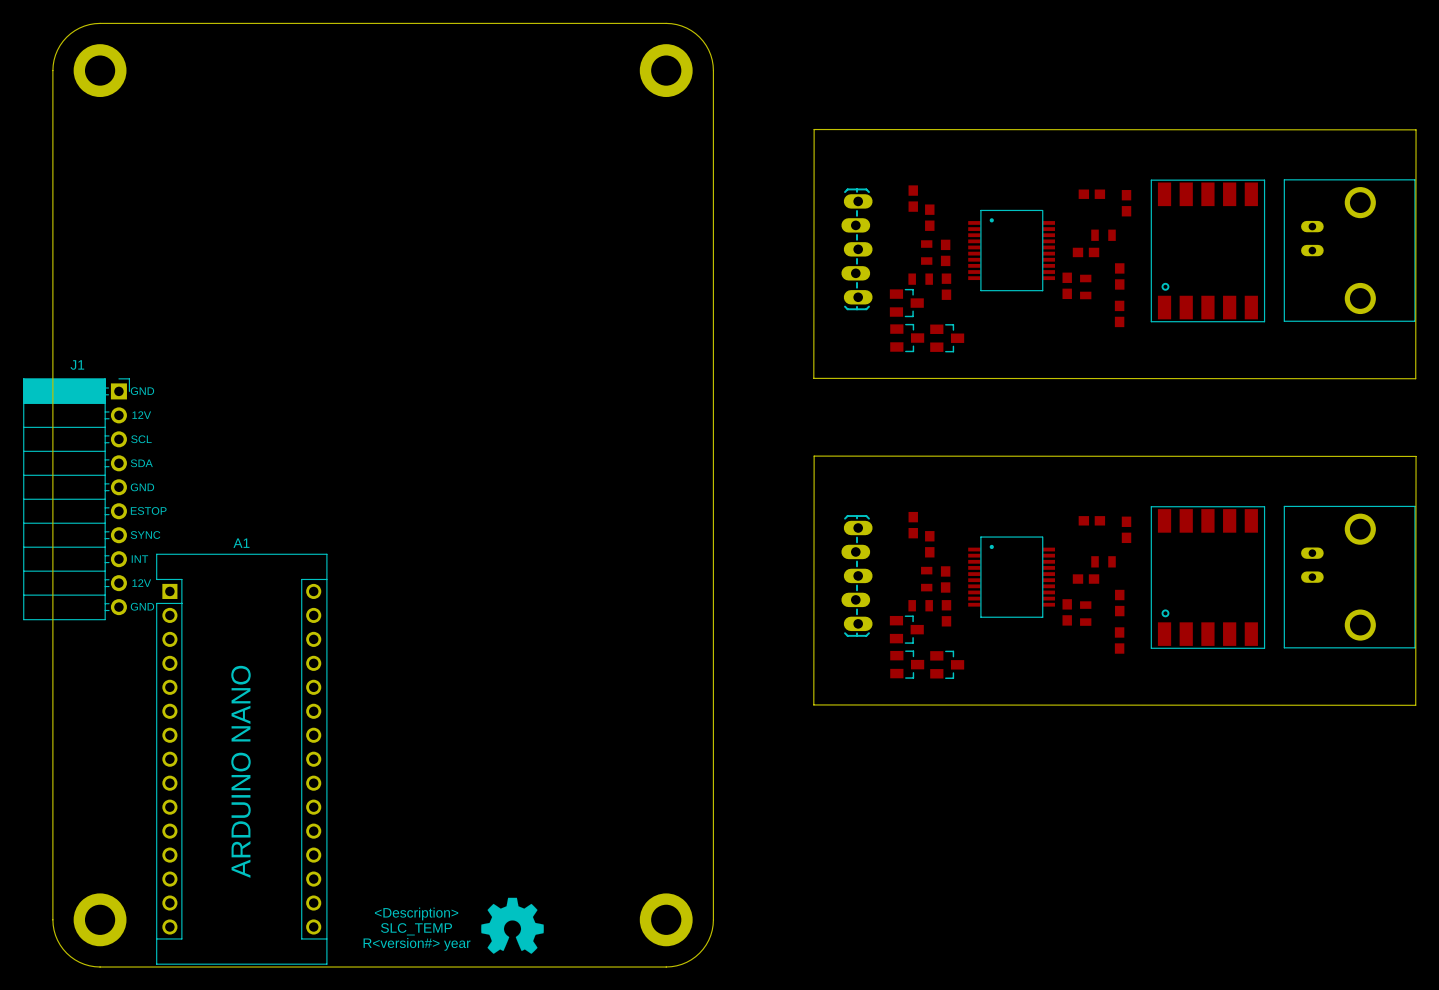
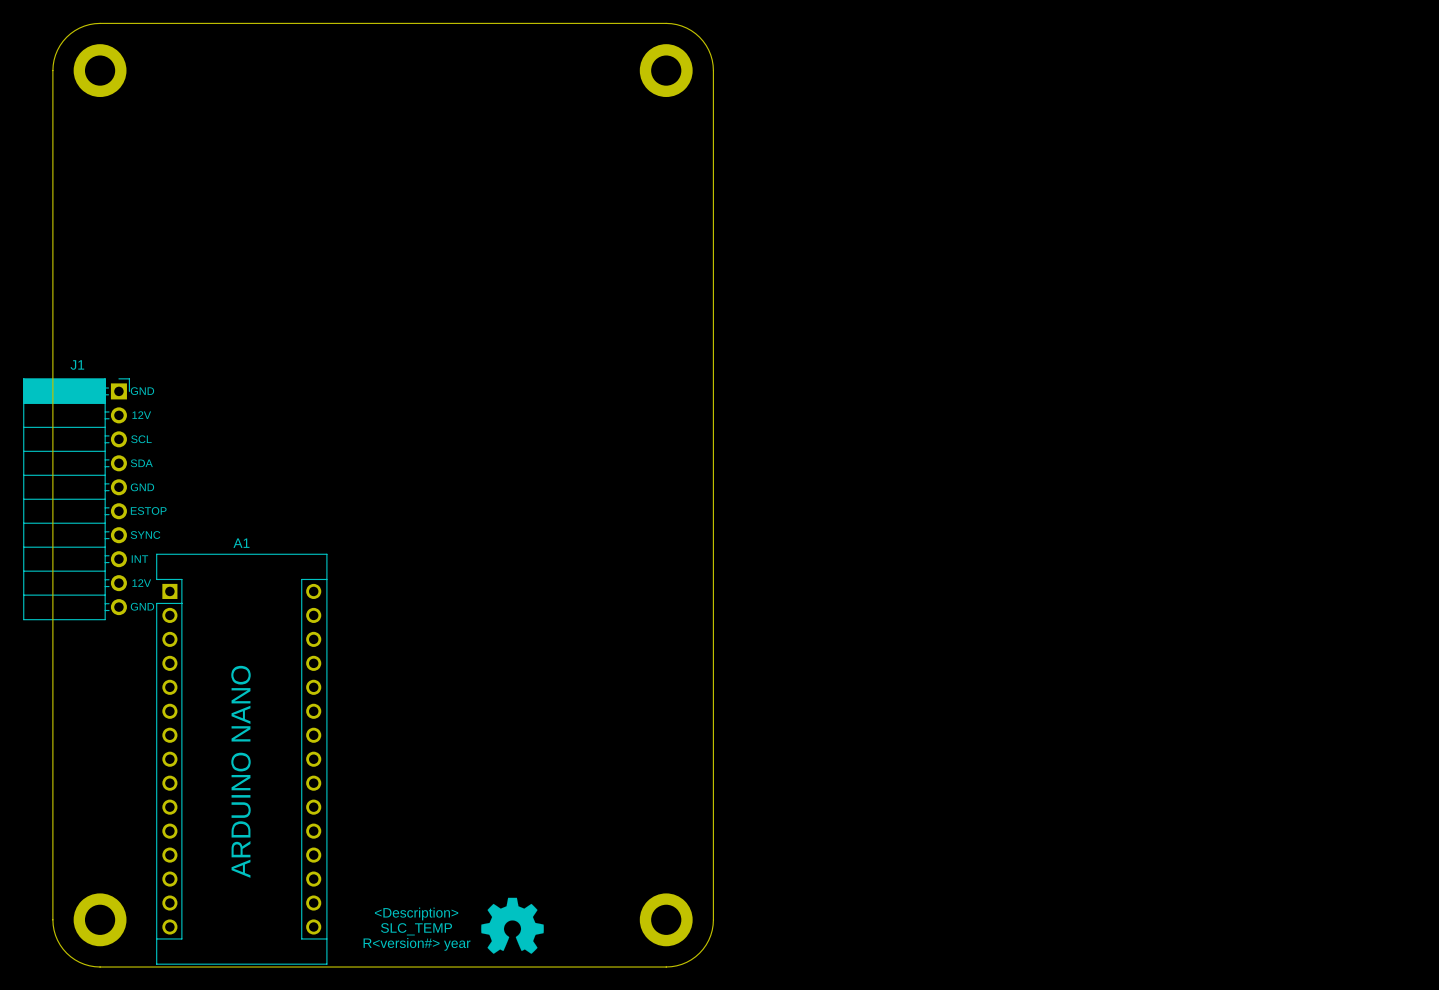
board edge: (814, 129) (1416, 129) (1415, 378) (813, 378) (814, 129) -> none
part: (1091, 194) -> none
part: (913, 198) -> none
part: (1126, 203) -> none
part: (929, 217) -> none
part: (1103, 235) -> none
part: (857, 249) -> none
part: (1011, 250) -> none
part: (1207, 250) -> none
part: (1349, 250) -> none
part: (926, 252) -> none
part: (945, 252) -> none
part: (1086, 252) -> none
part: (1119, 276) -> none
part: (920, 279) -> none
part: (1067, 285) -> none
part: (946, 286) -> none
part: (1085, 286) -> none
part: (906, 303) -> none
part: (1119, 313) -> none
part: (907, 338) -> none
part: (947, 338) -> none
board edge: (814, 456) (813, 704) (1415, 705) (1416, 456) (814, 456) -> none
part: (1091, 520) -> none
part: (913, 525) -> none
part: (1126, 529) -> none
part: (929, 544) -> none
part: (1103, 561) -> none
part: (857, 575) -> none
part: (1011, 577) -> none
part: (1207, 577) -> none
part: (1349, 577) -> none
part: (926, 579) -> none
part: (945, 579) -> none
part: (1086, 579) -> none
part: (1119, 603) -> none
part: (920, 605) -> none
part: (1067, 612) -> none
part: (946, 613) -> none
part: (1085, 613) -> none
part: (906, 629) -> none
part: (1119, 640) -> none
part: (907, 664) -> none
part: (947, 664) -> none

